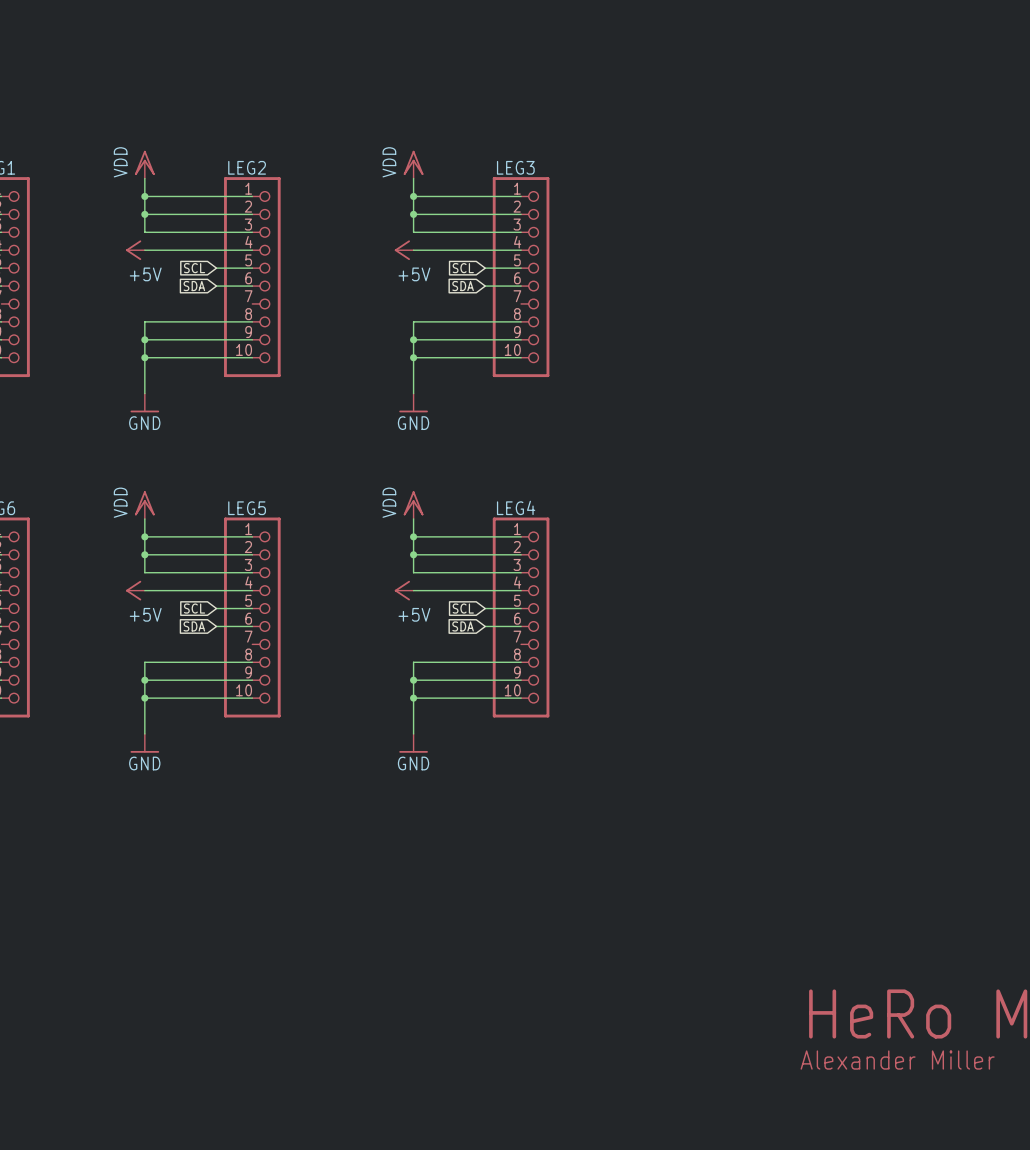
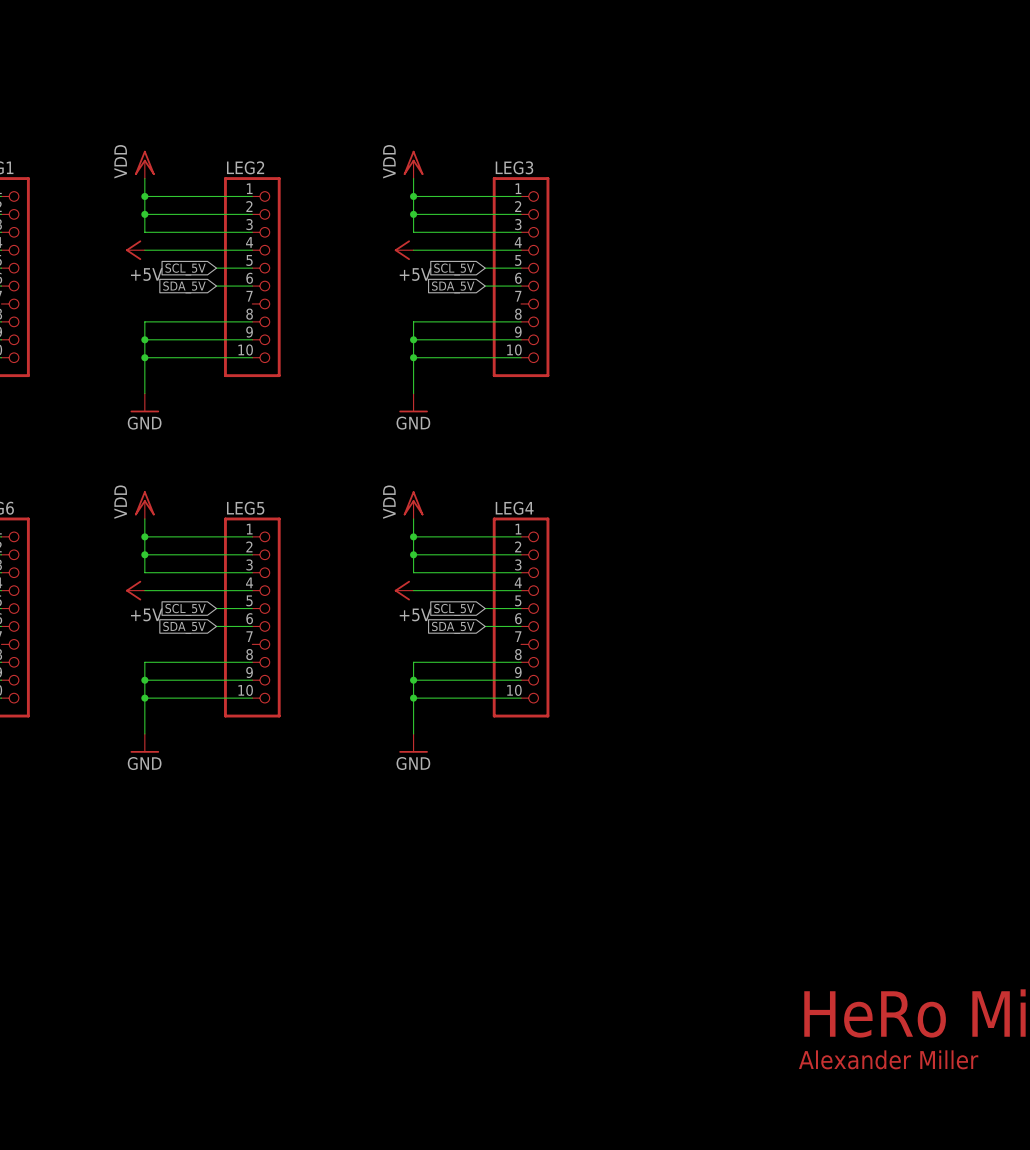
global label: SCL (194, 268) -> SCL_5V (185, 269)
global label: SCL (463, 268) -> SCL_5V (454, 269)
global label: SDA (194, 286) -> SDA_5V (184, 287)
global label: SDA (463, 286) -> SDA_5V (453, 287)
global label: SCL (194, 608) -> SCL_5V (185, 609)
global label: SCL (463, 608) -> SCL_5V (454, 609)
global label: SDA (194, 626) -> SDA_5V (184, 627)
global label: SDA (463, 626) -> SDA_5V (453, 627)

